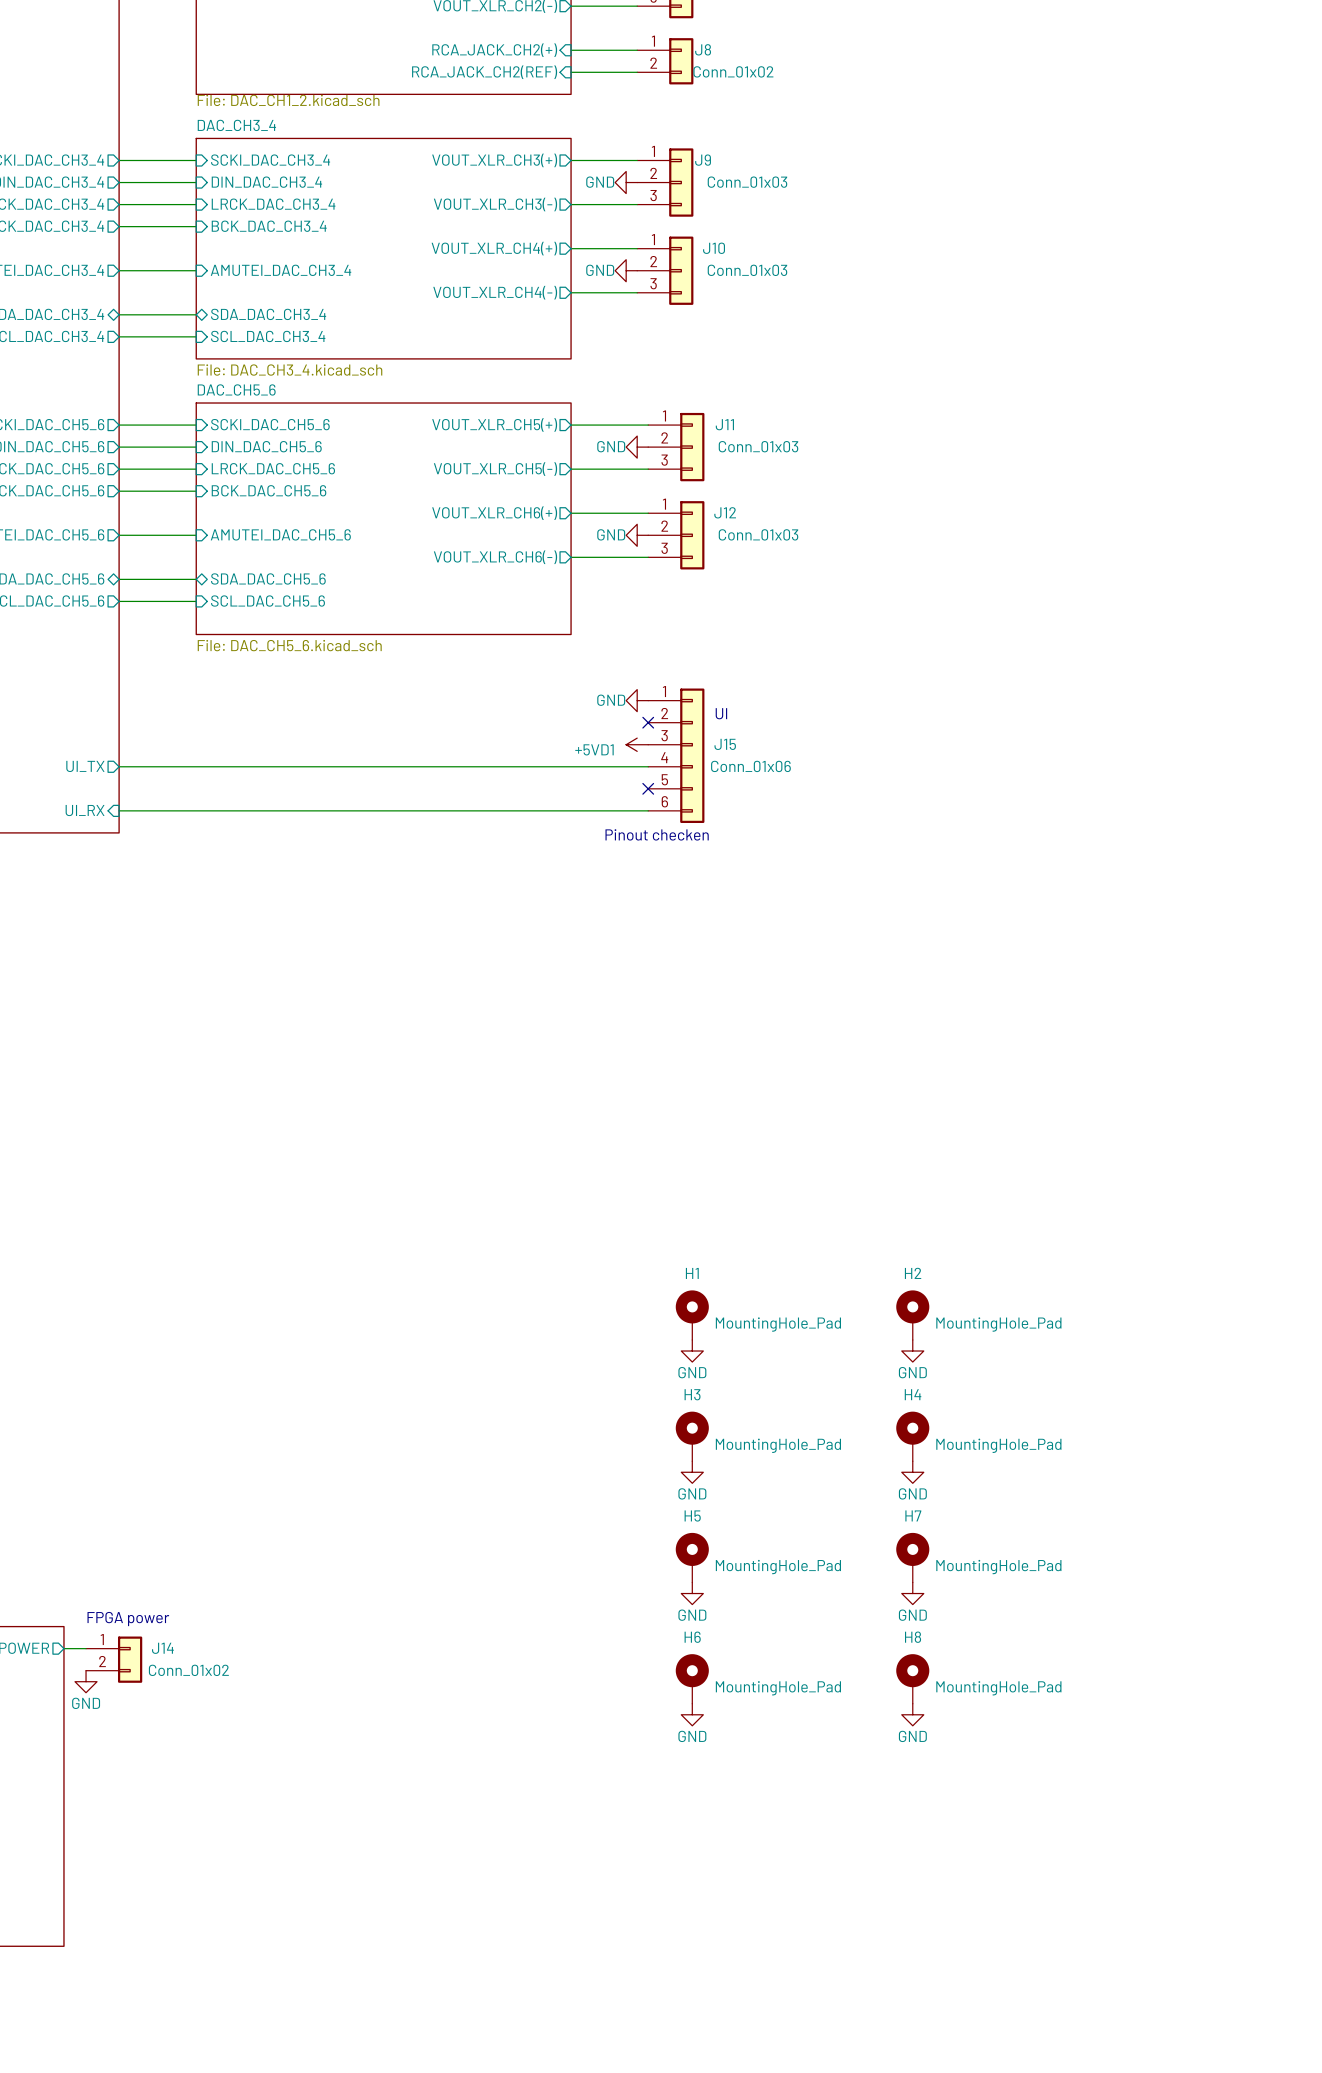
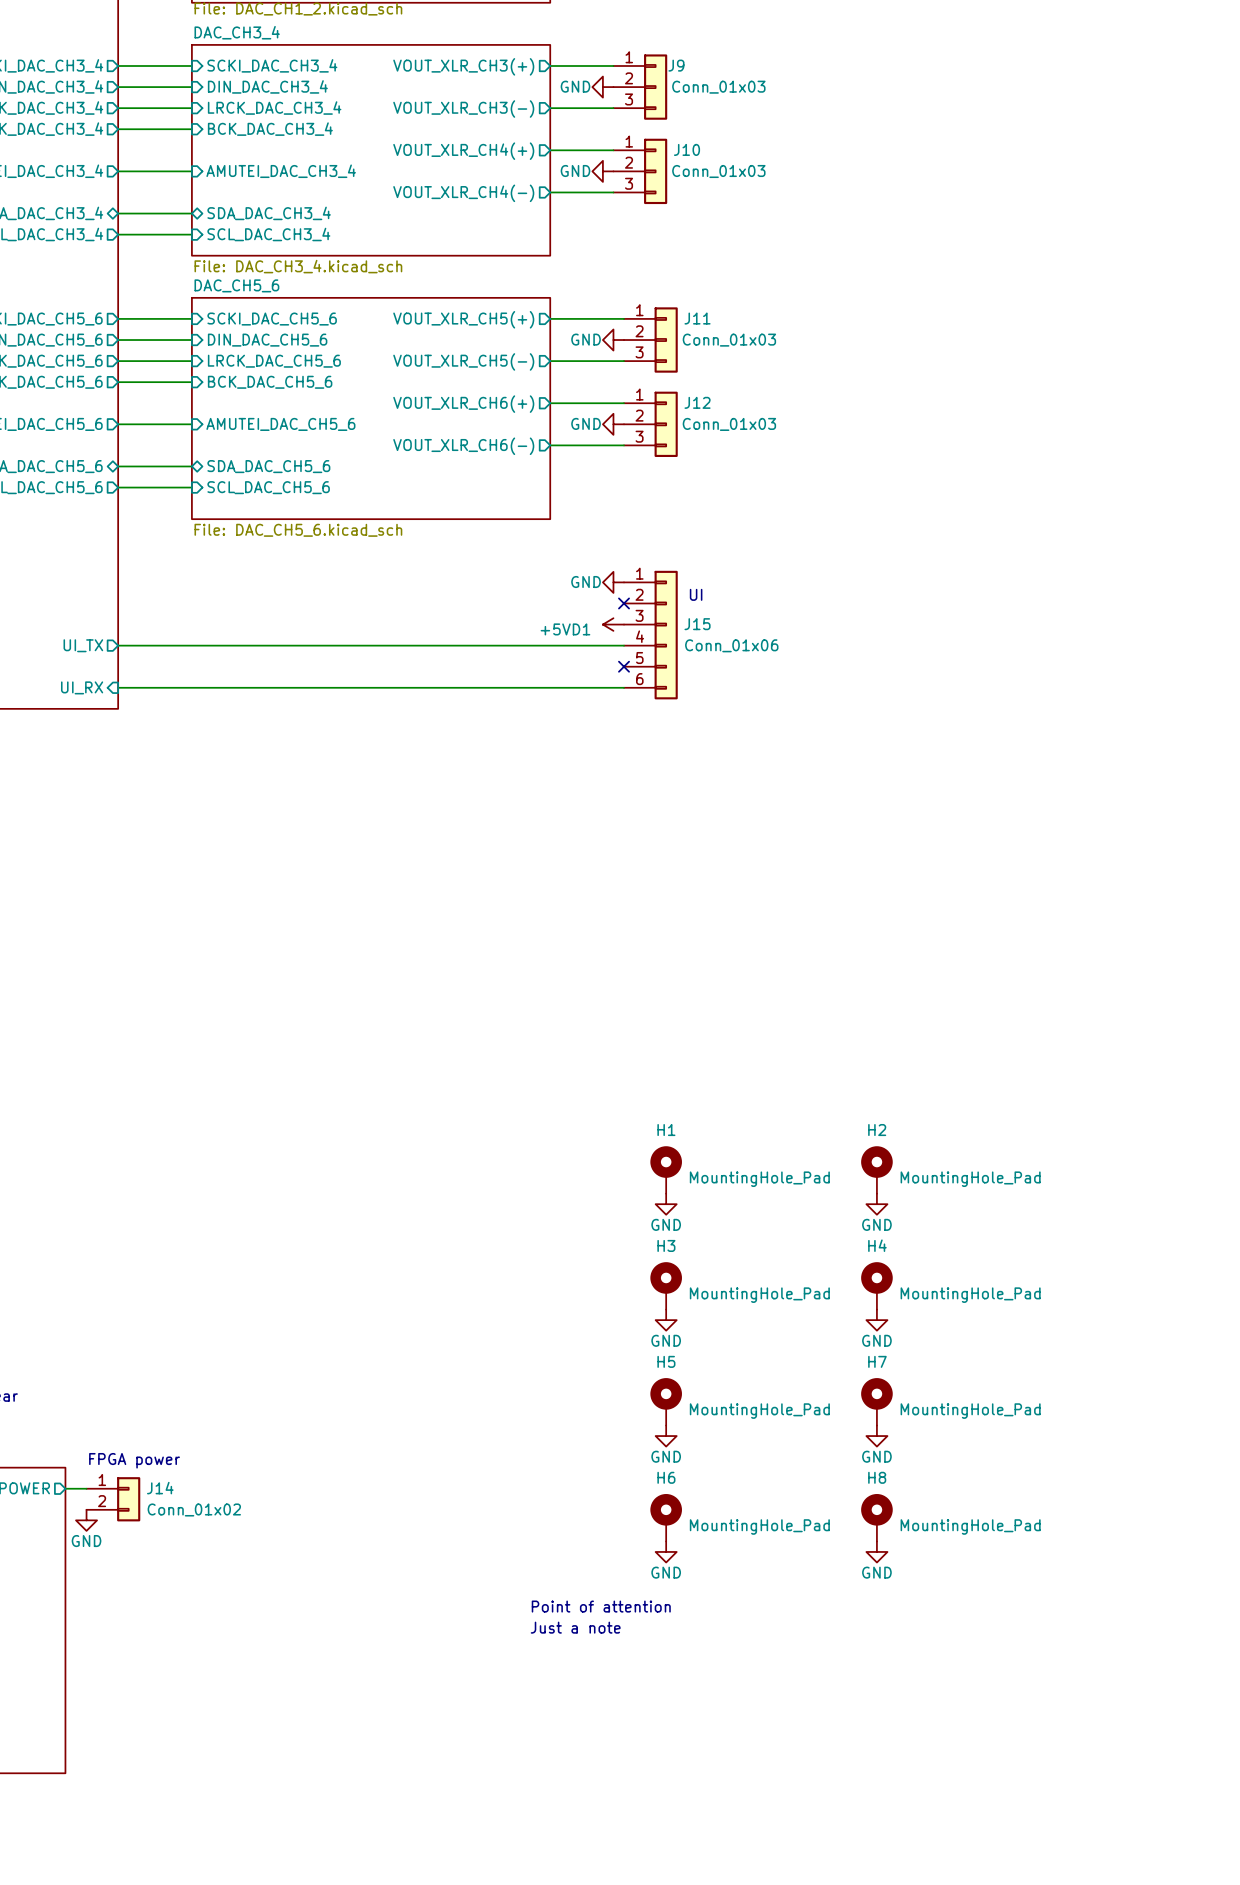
text: Pinout checken (657, 834) -> none
text: none -> Point of attention (601, 1606)
text: none -> Just a note (575, 1627)

